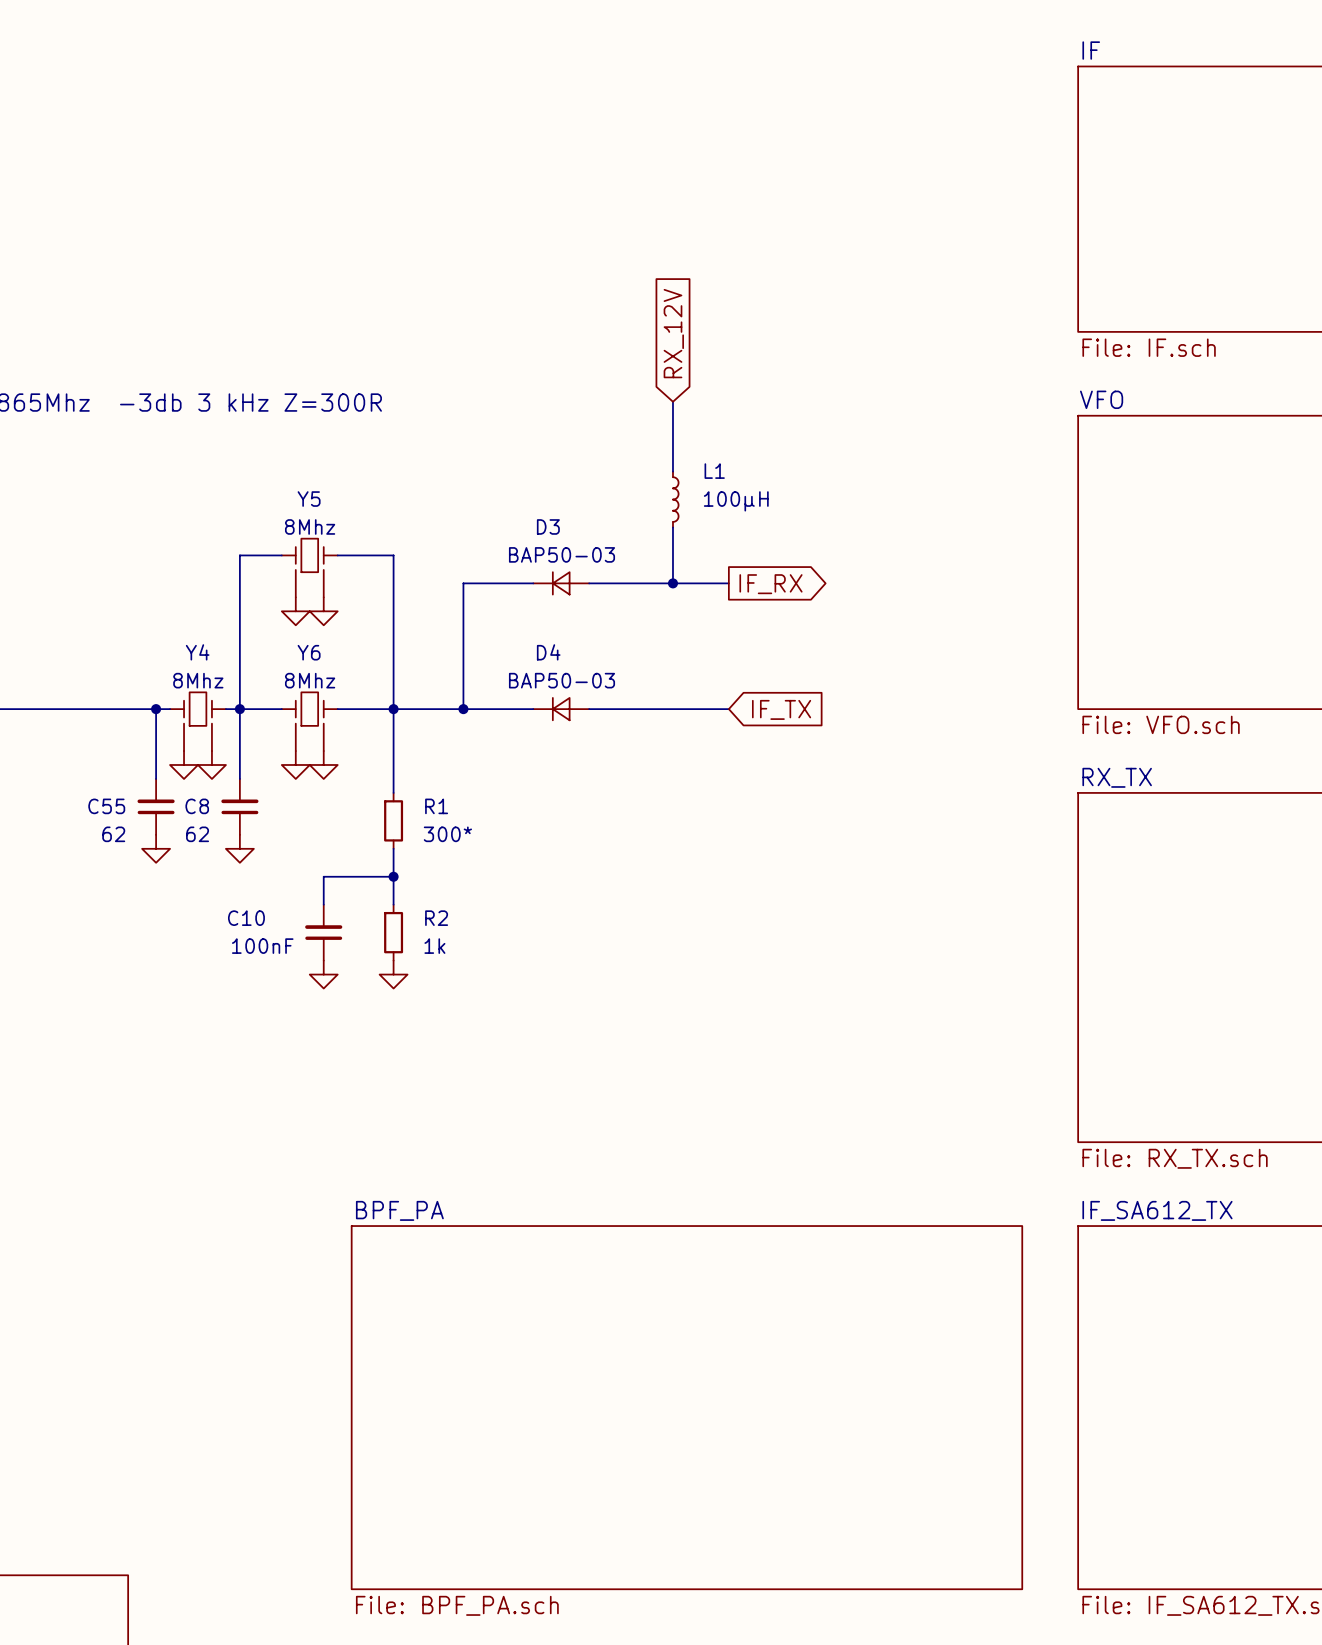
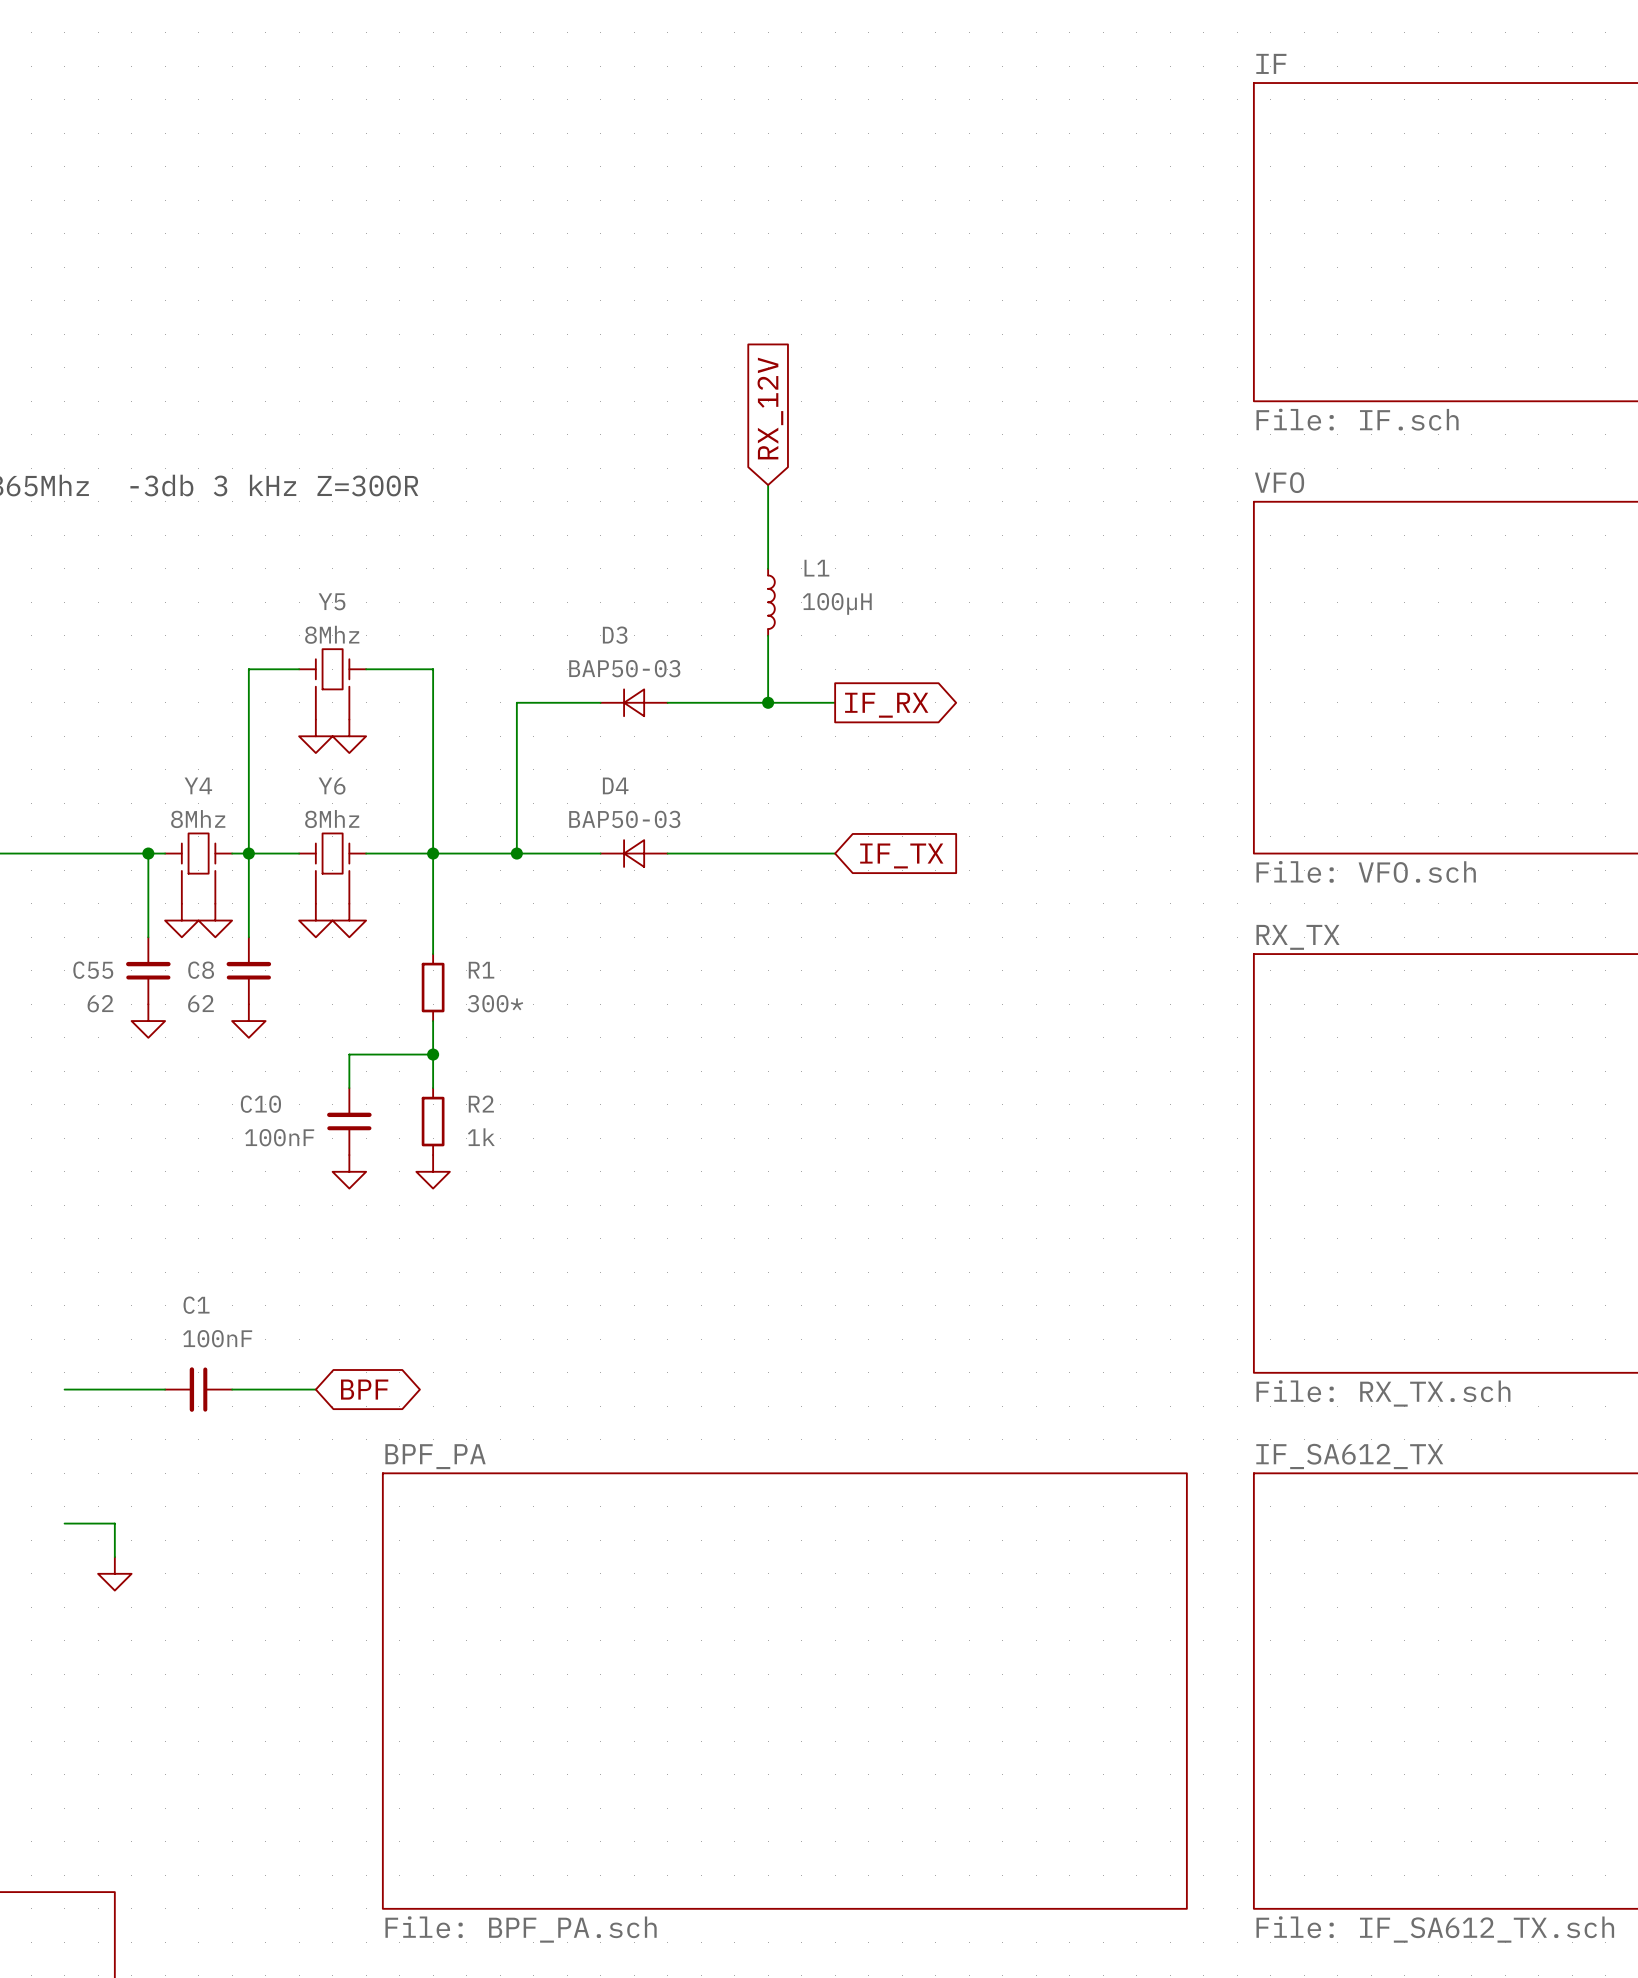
wire: none -> (64, 1389) (165, 1389)
C1: none -> 100nF (198, 1389)
wire: none -> (232, 1389) (315, 1389)
global label: none -> BPF (364, 1389)
wire: none -> (64, 1523) (114, 1523) (114, 1557)
power symbol: none -> (114, 1573)

